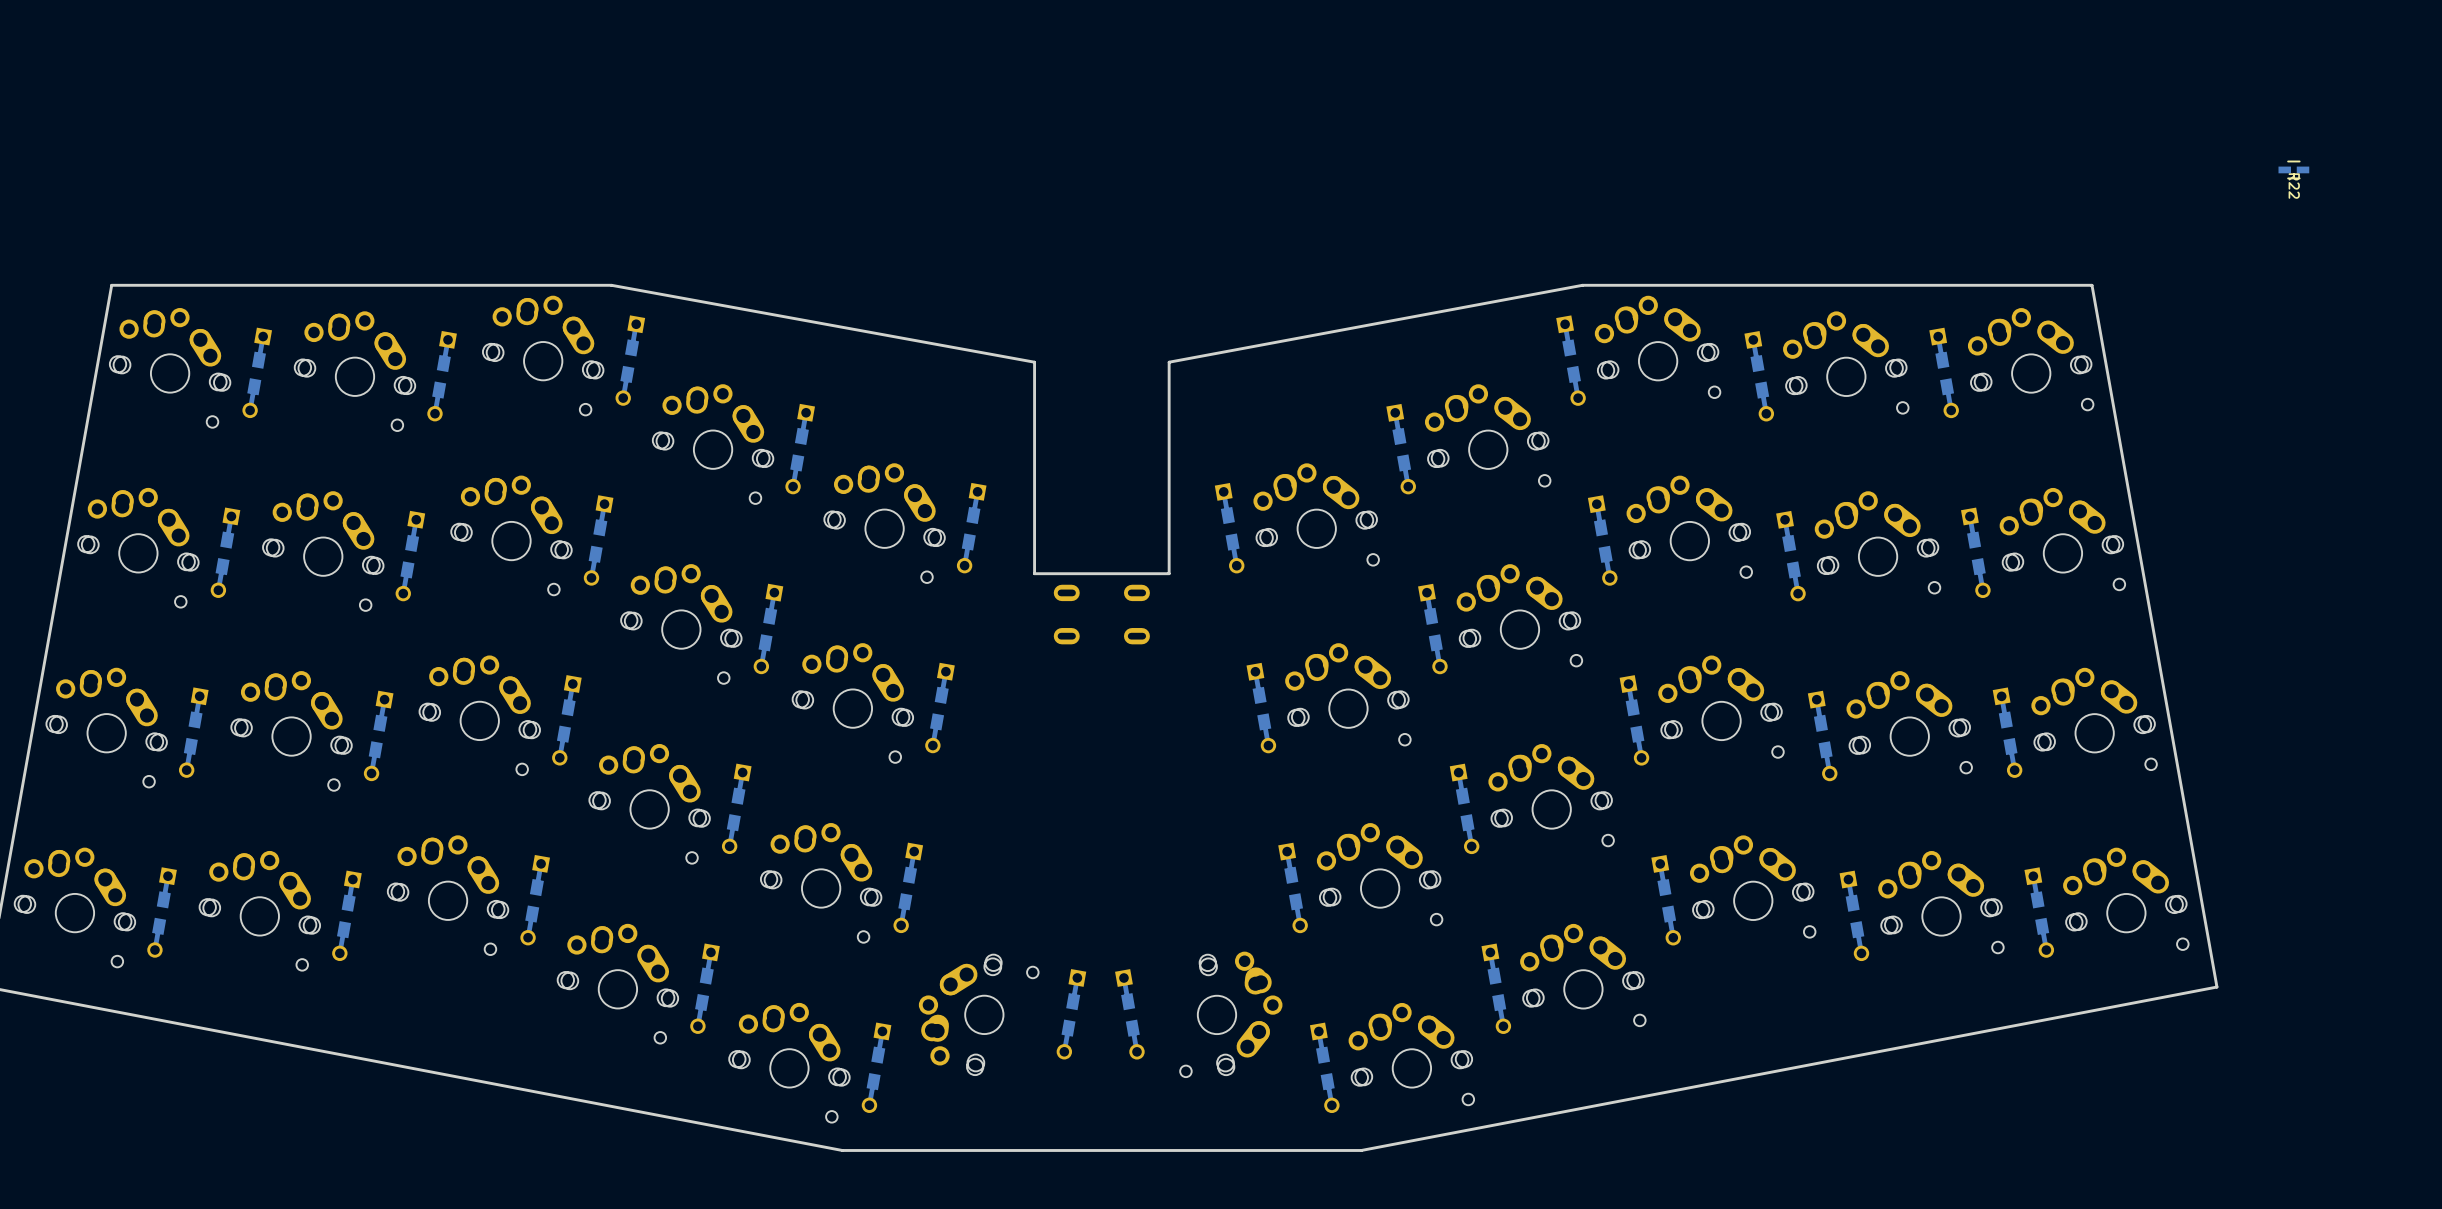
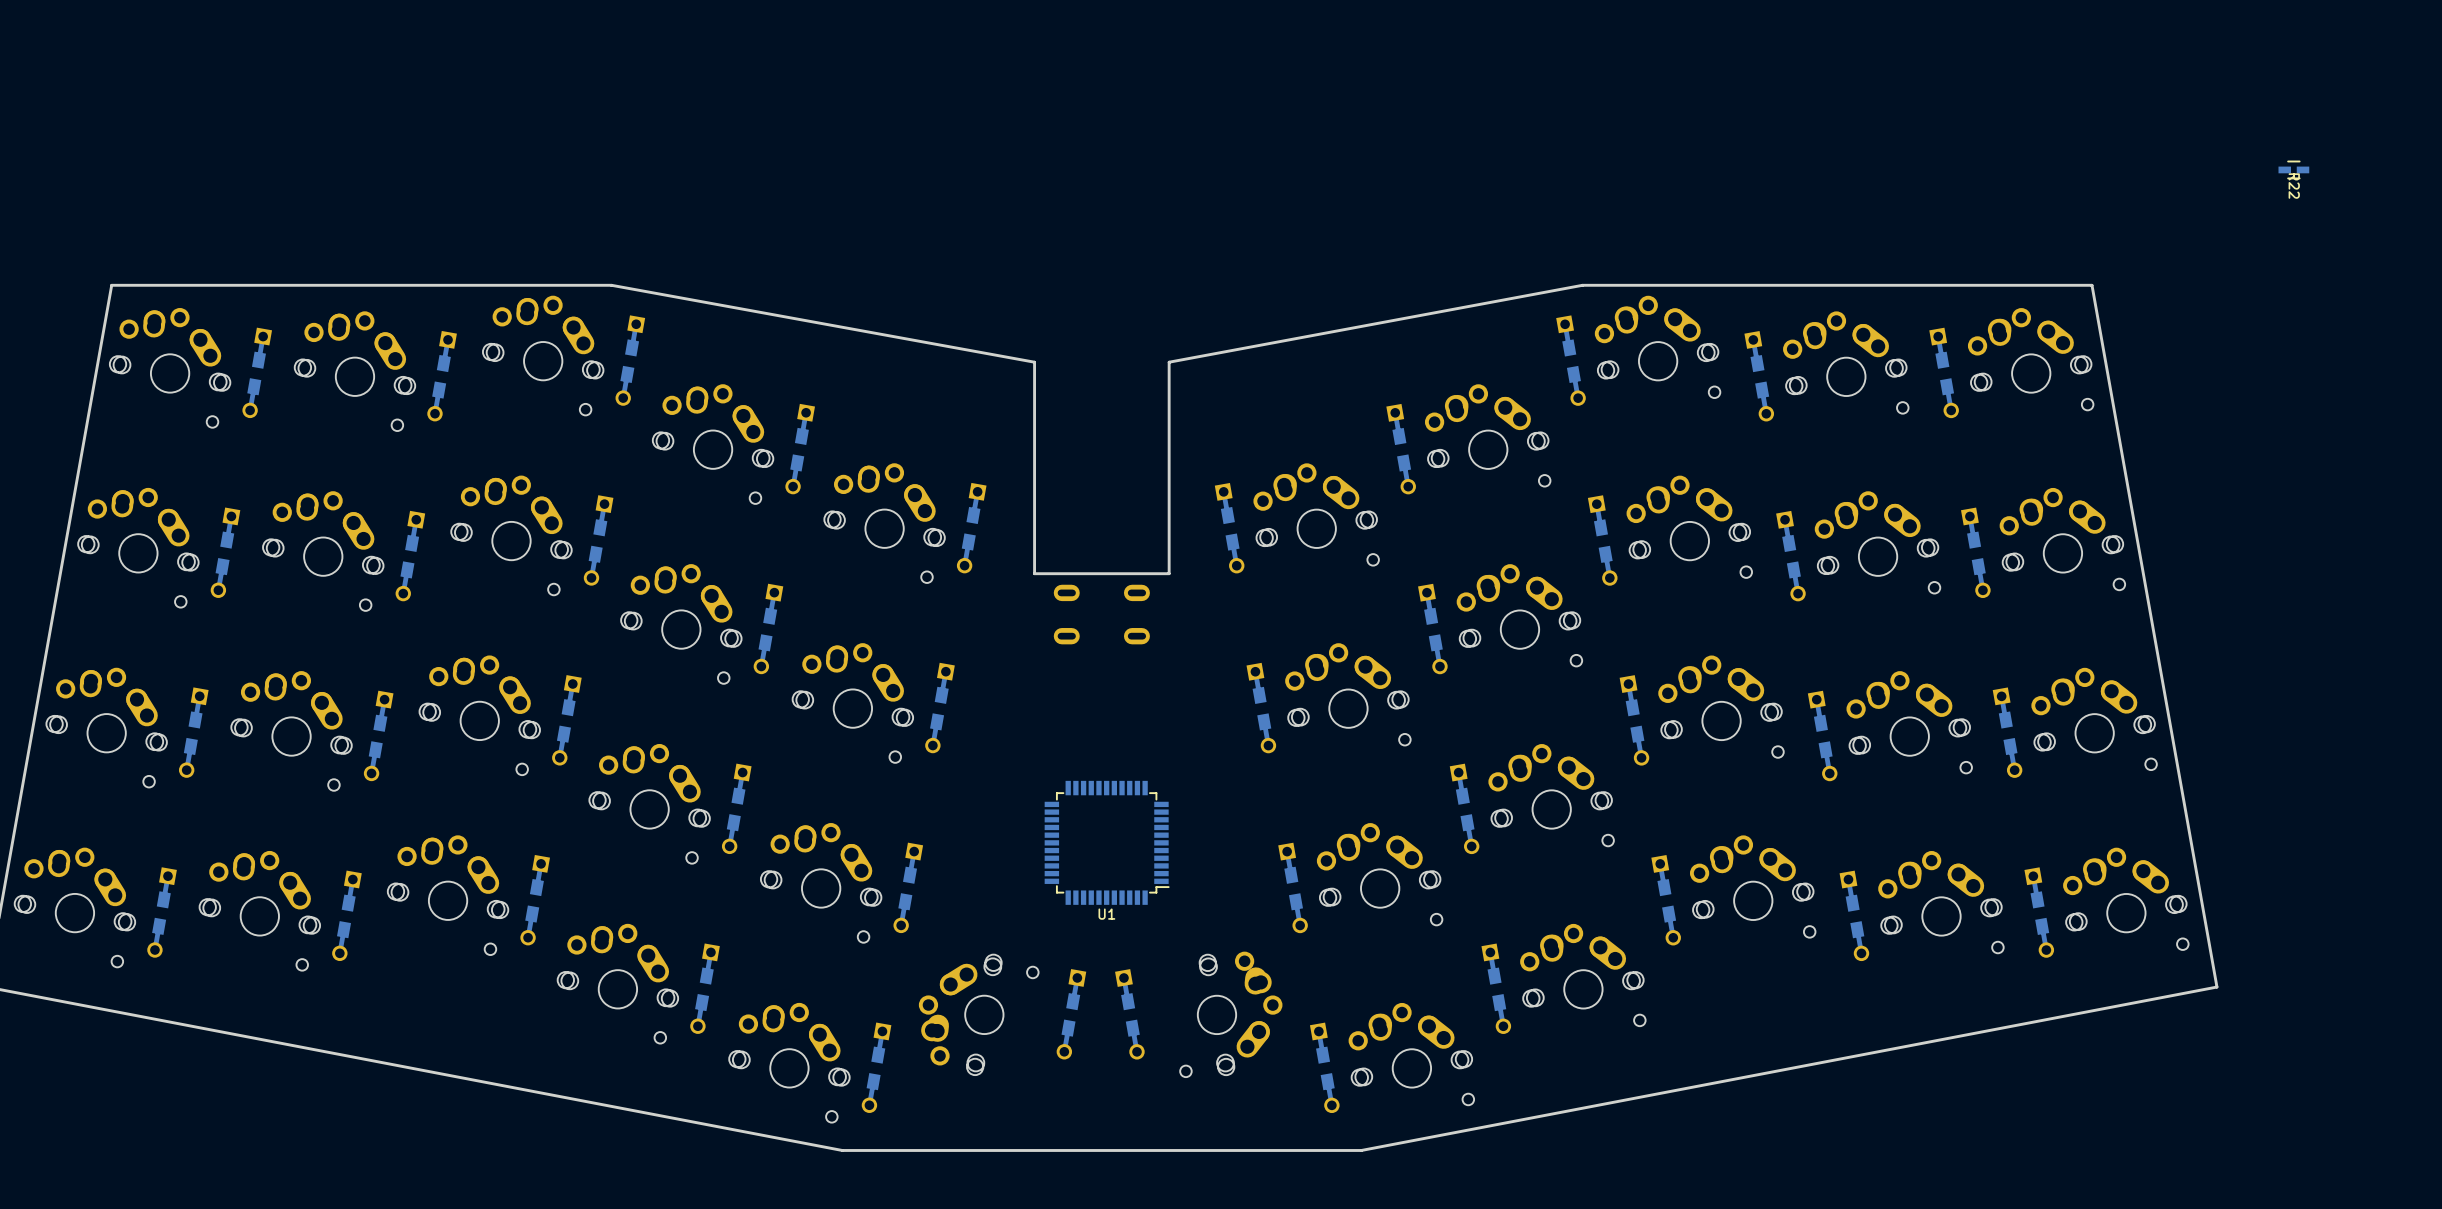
U1: none -> (1107, 842)

